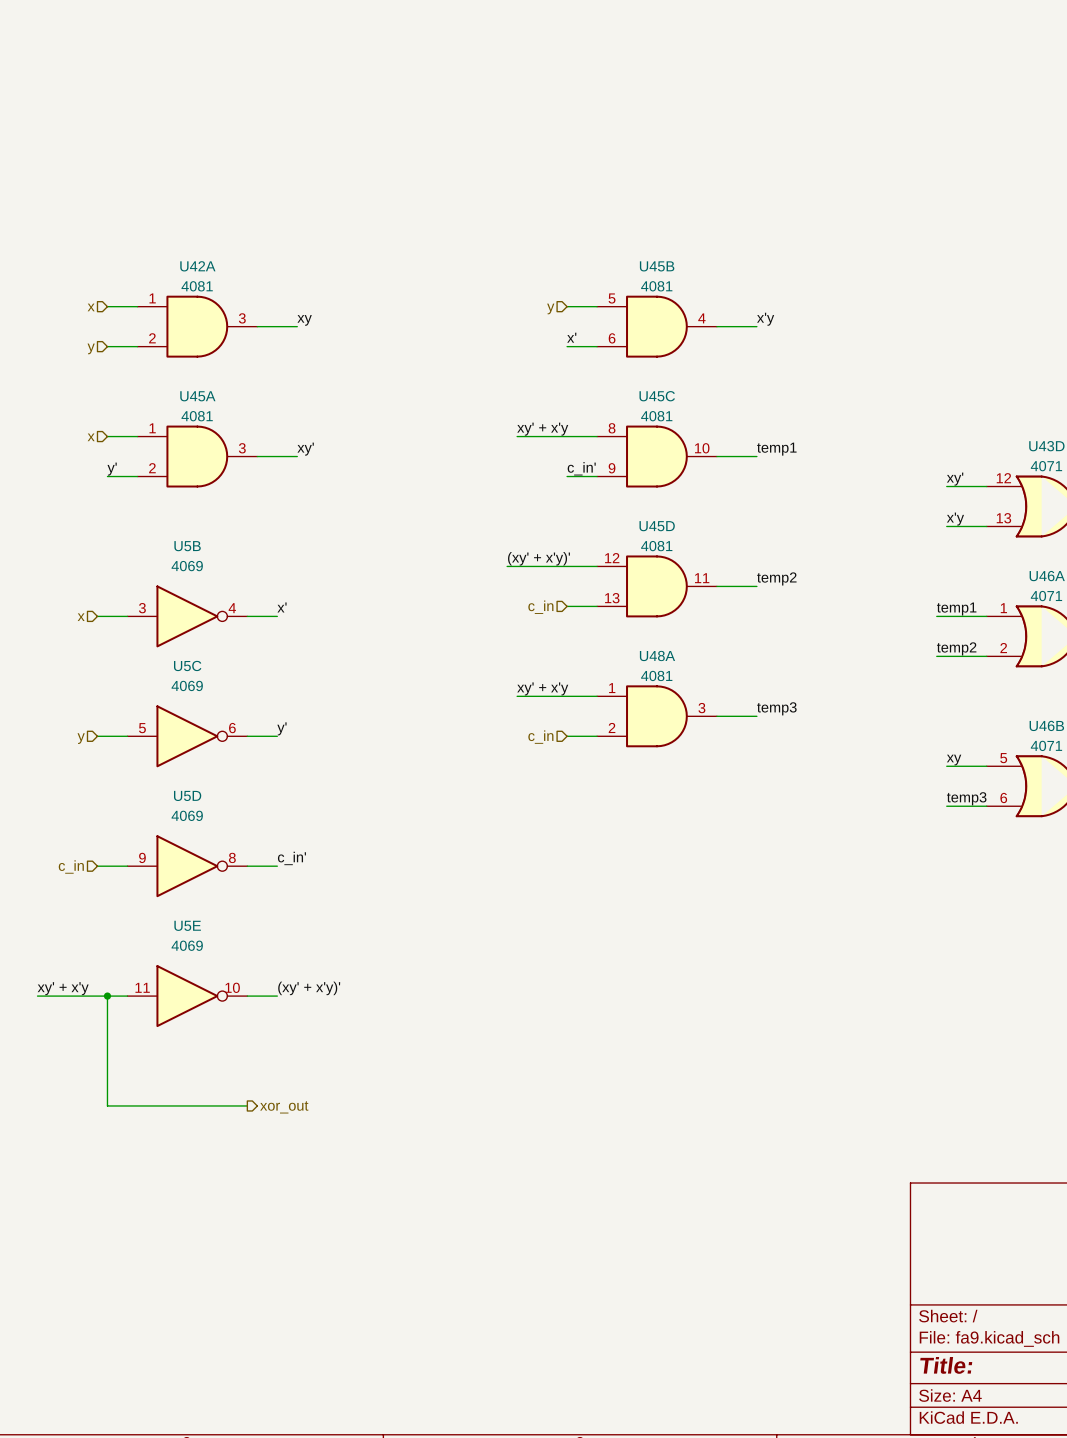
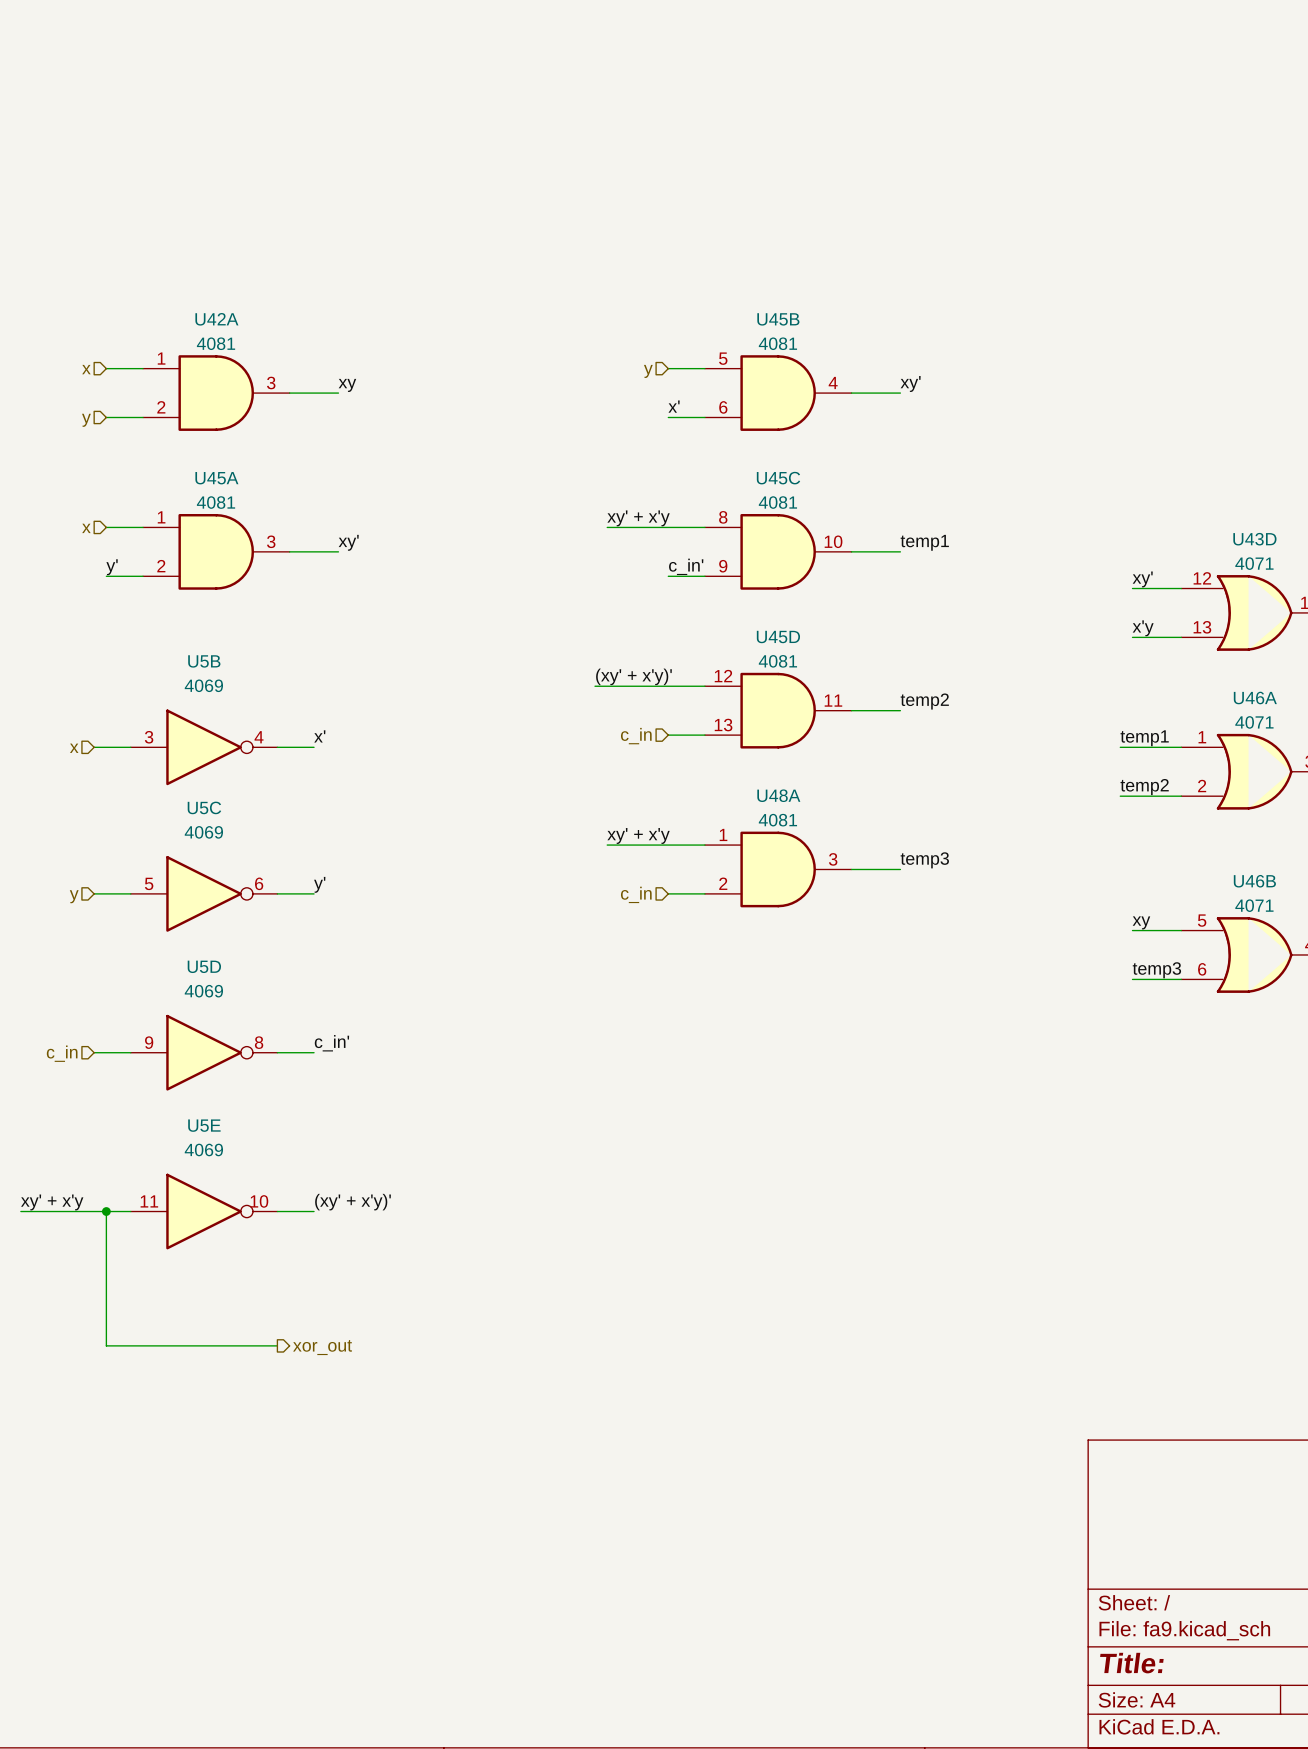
label: x'y (765, 319) -> xy' (910, 384)

